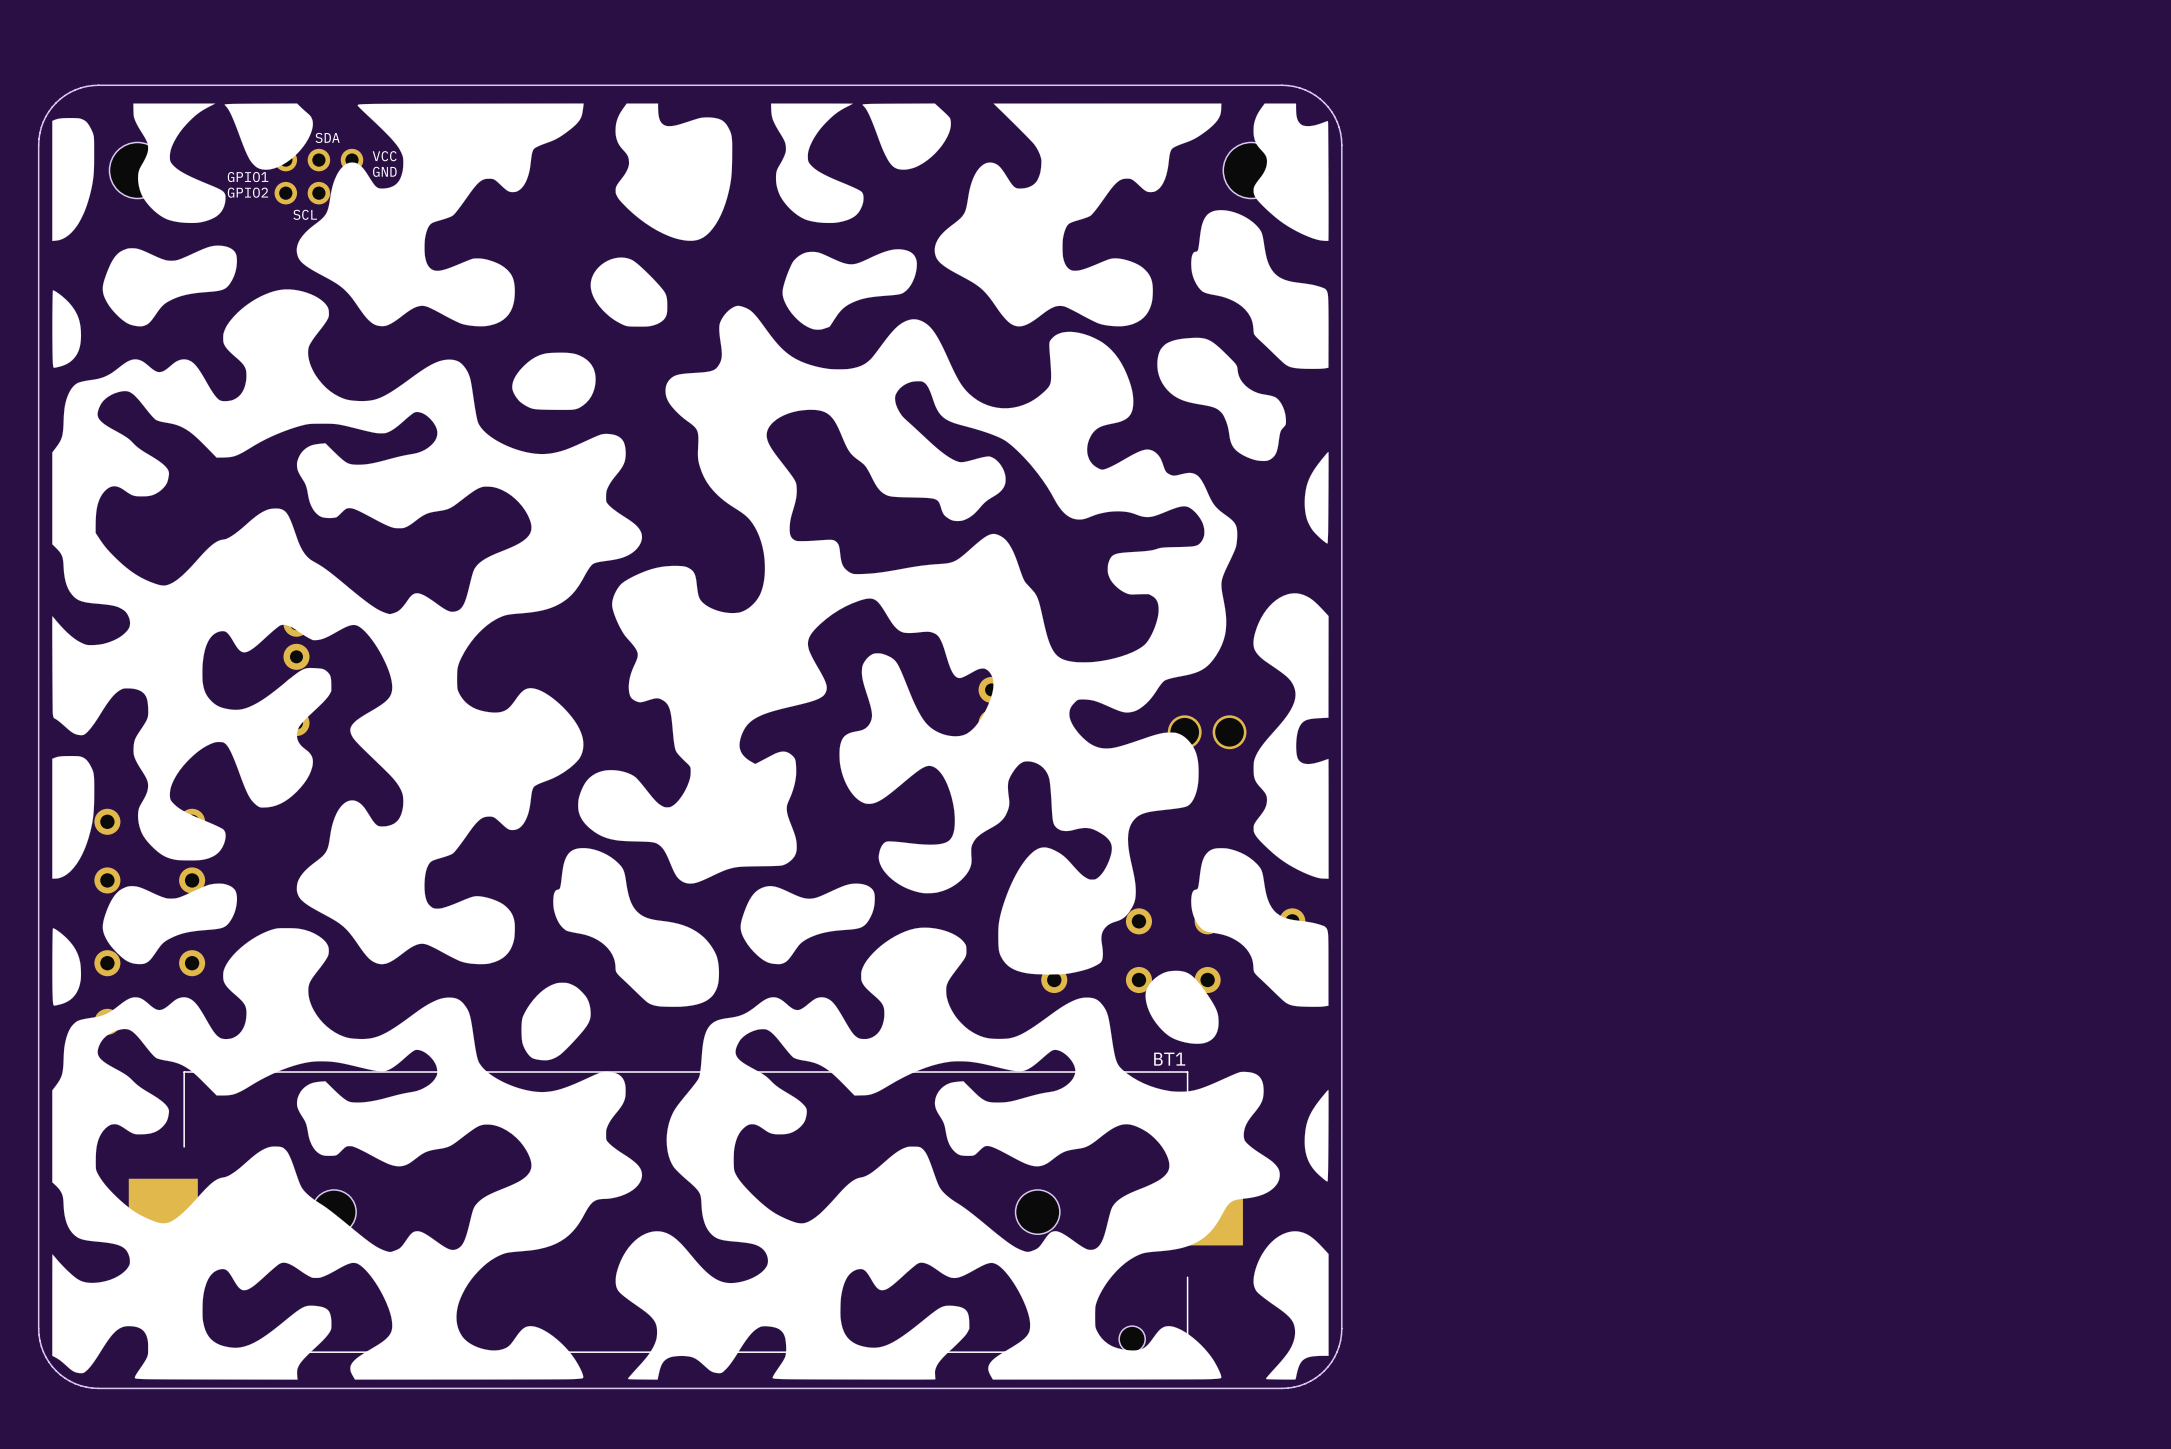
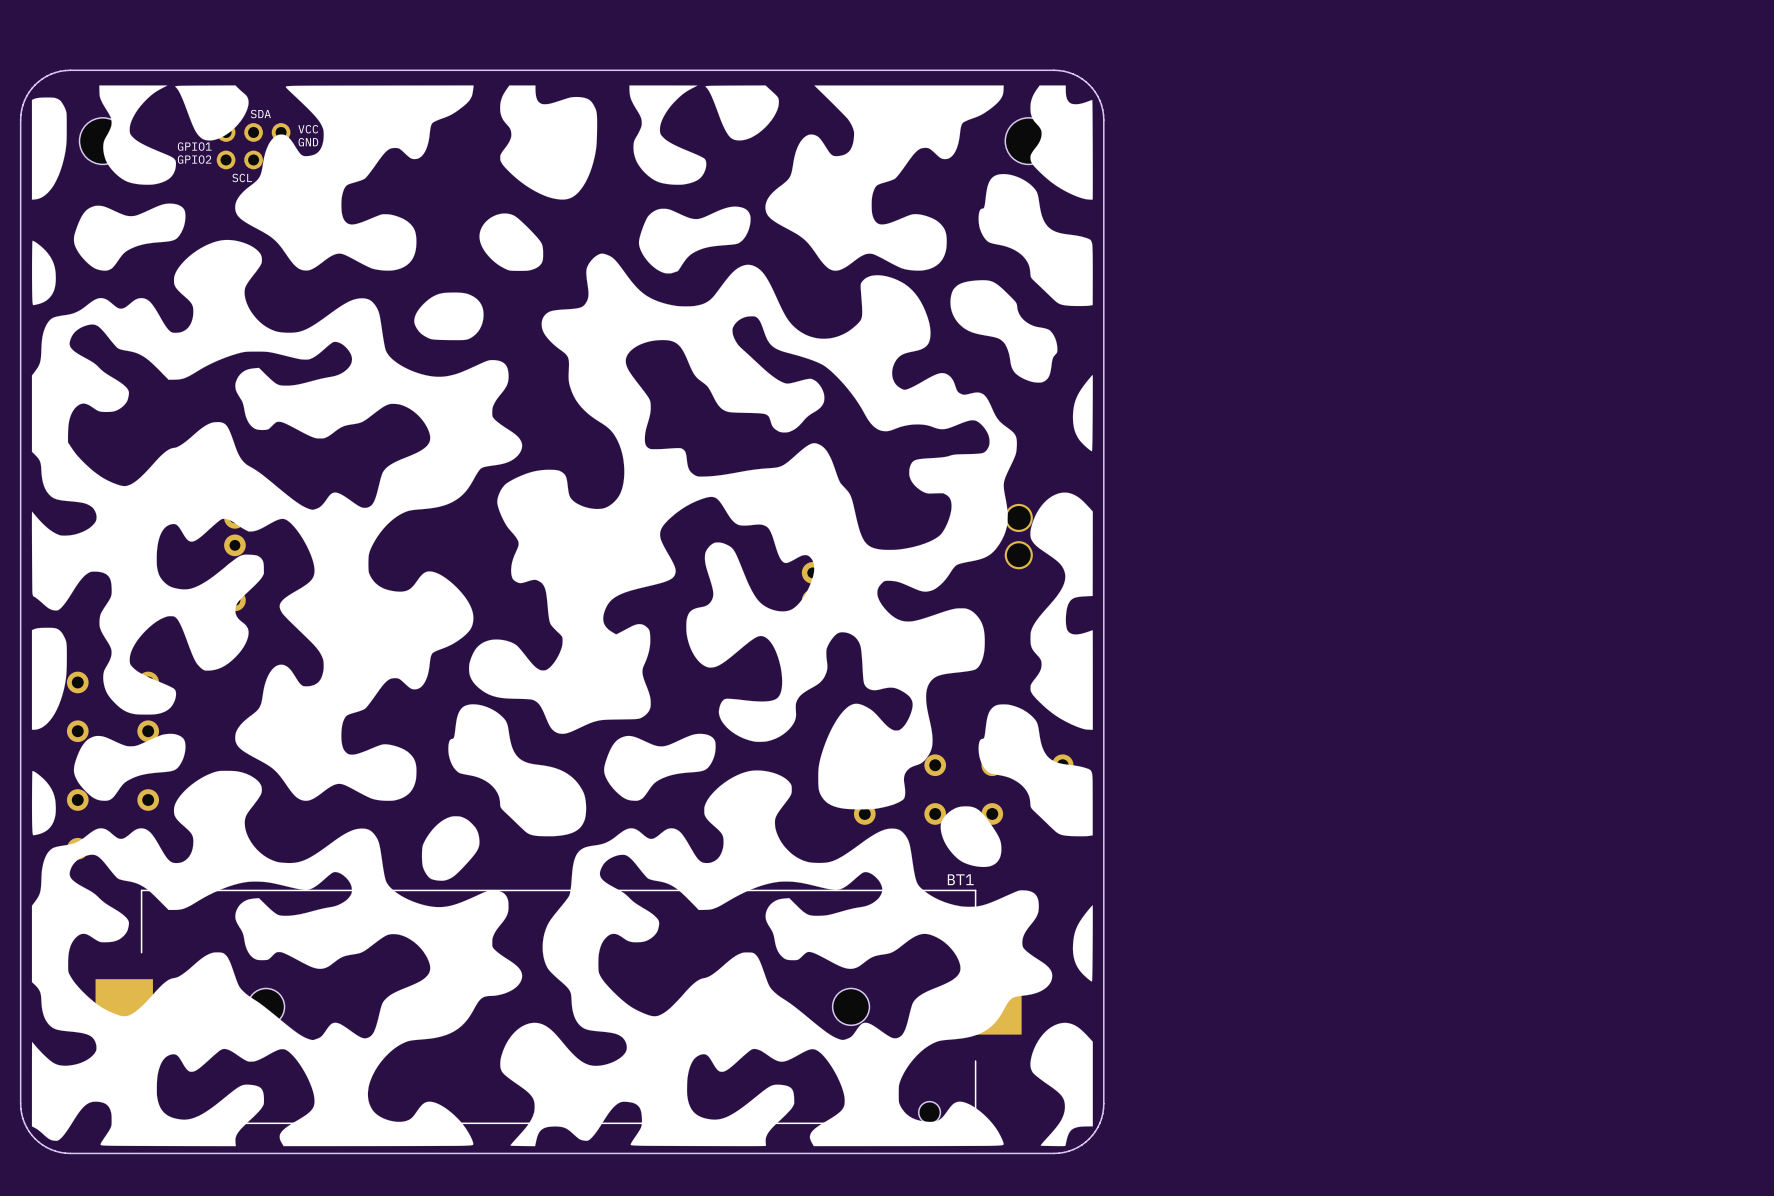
part rotation: 0° (1207, 732) -> 90° clockwise (1018, 536)
part position: (1207, 732) -> (1018, 536)

